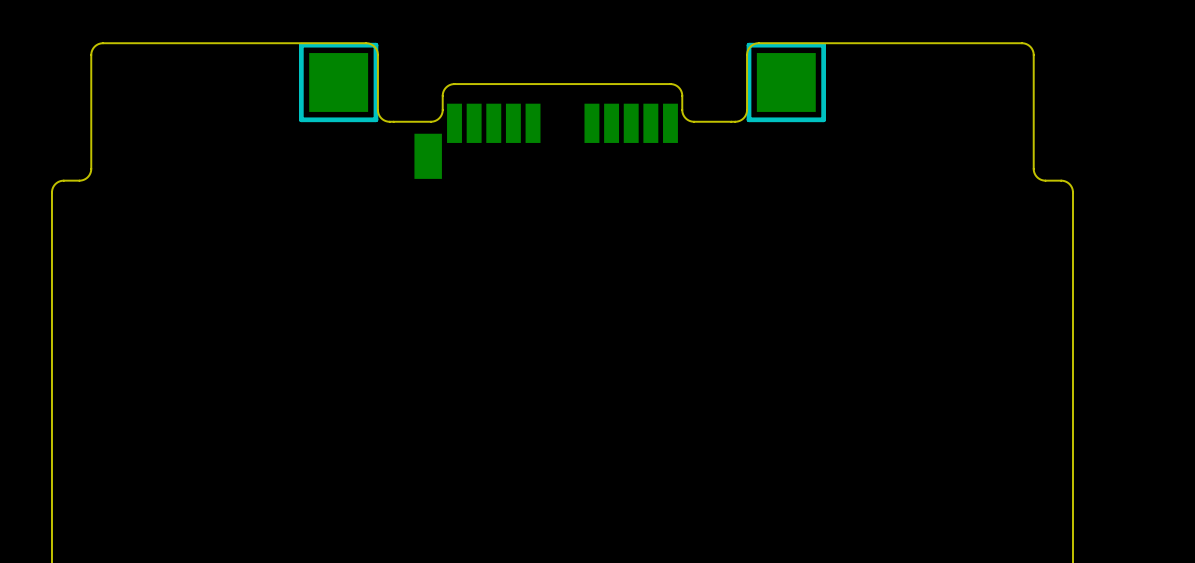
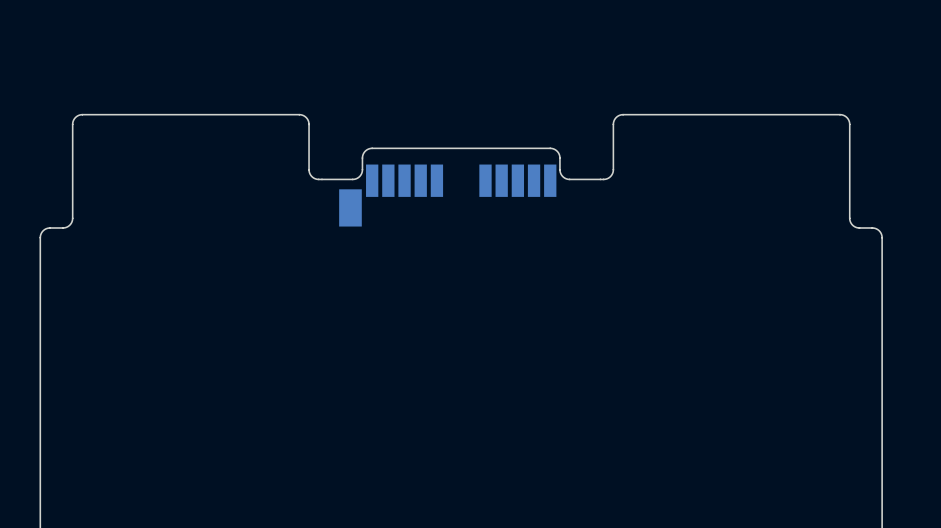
part: (338, 82) -> none
part: (786, 82) -> none

